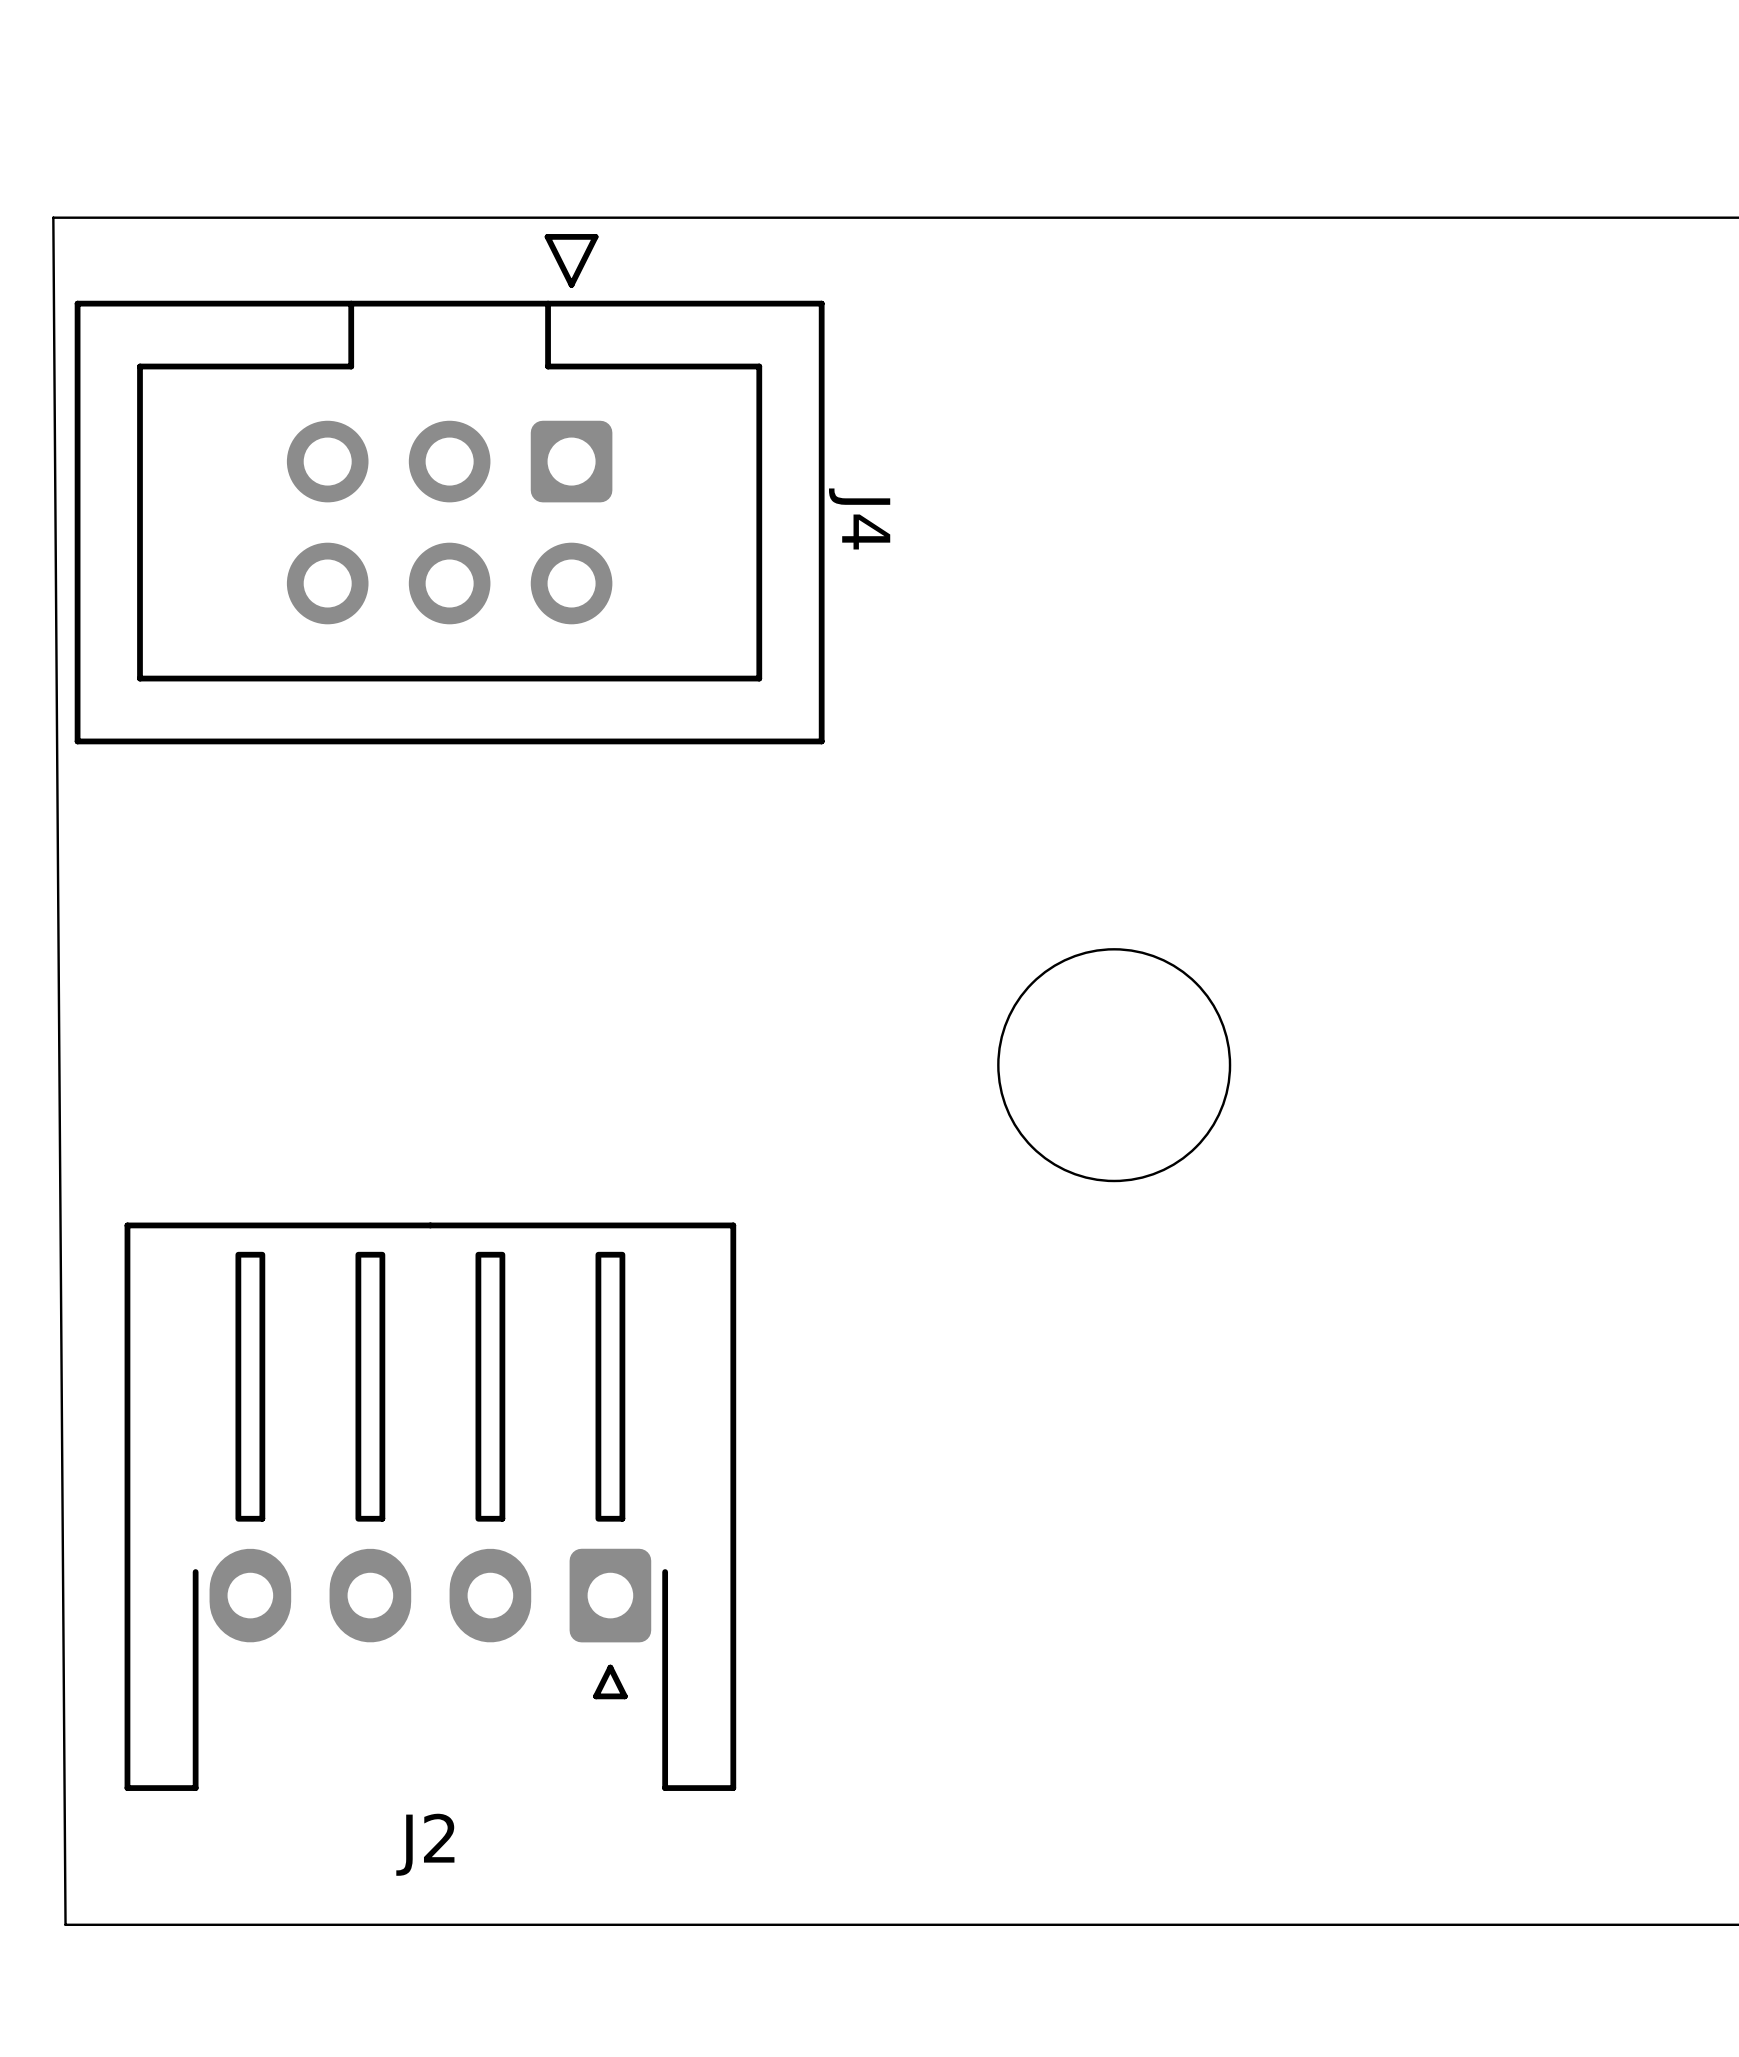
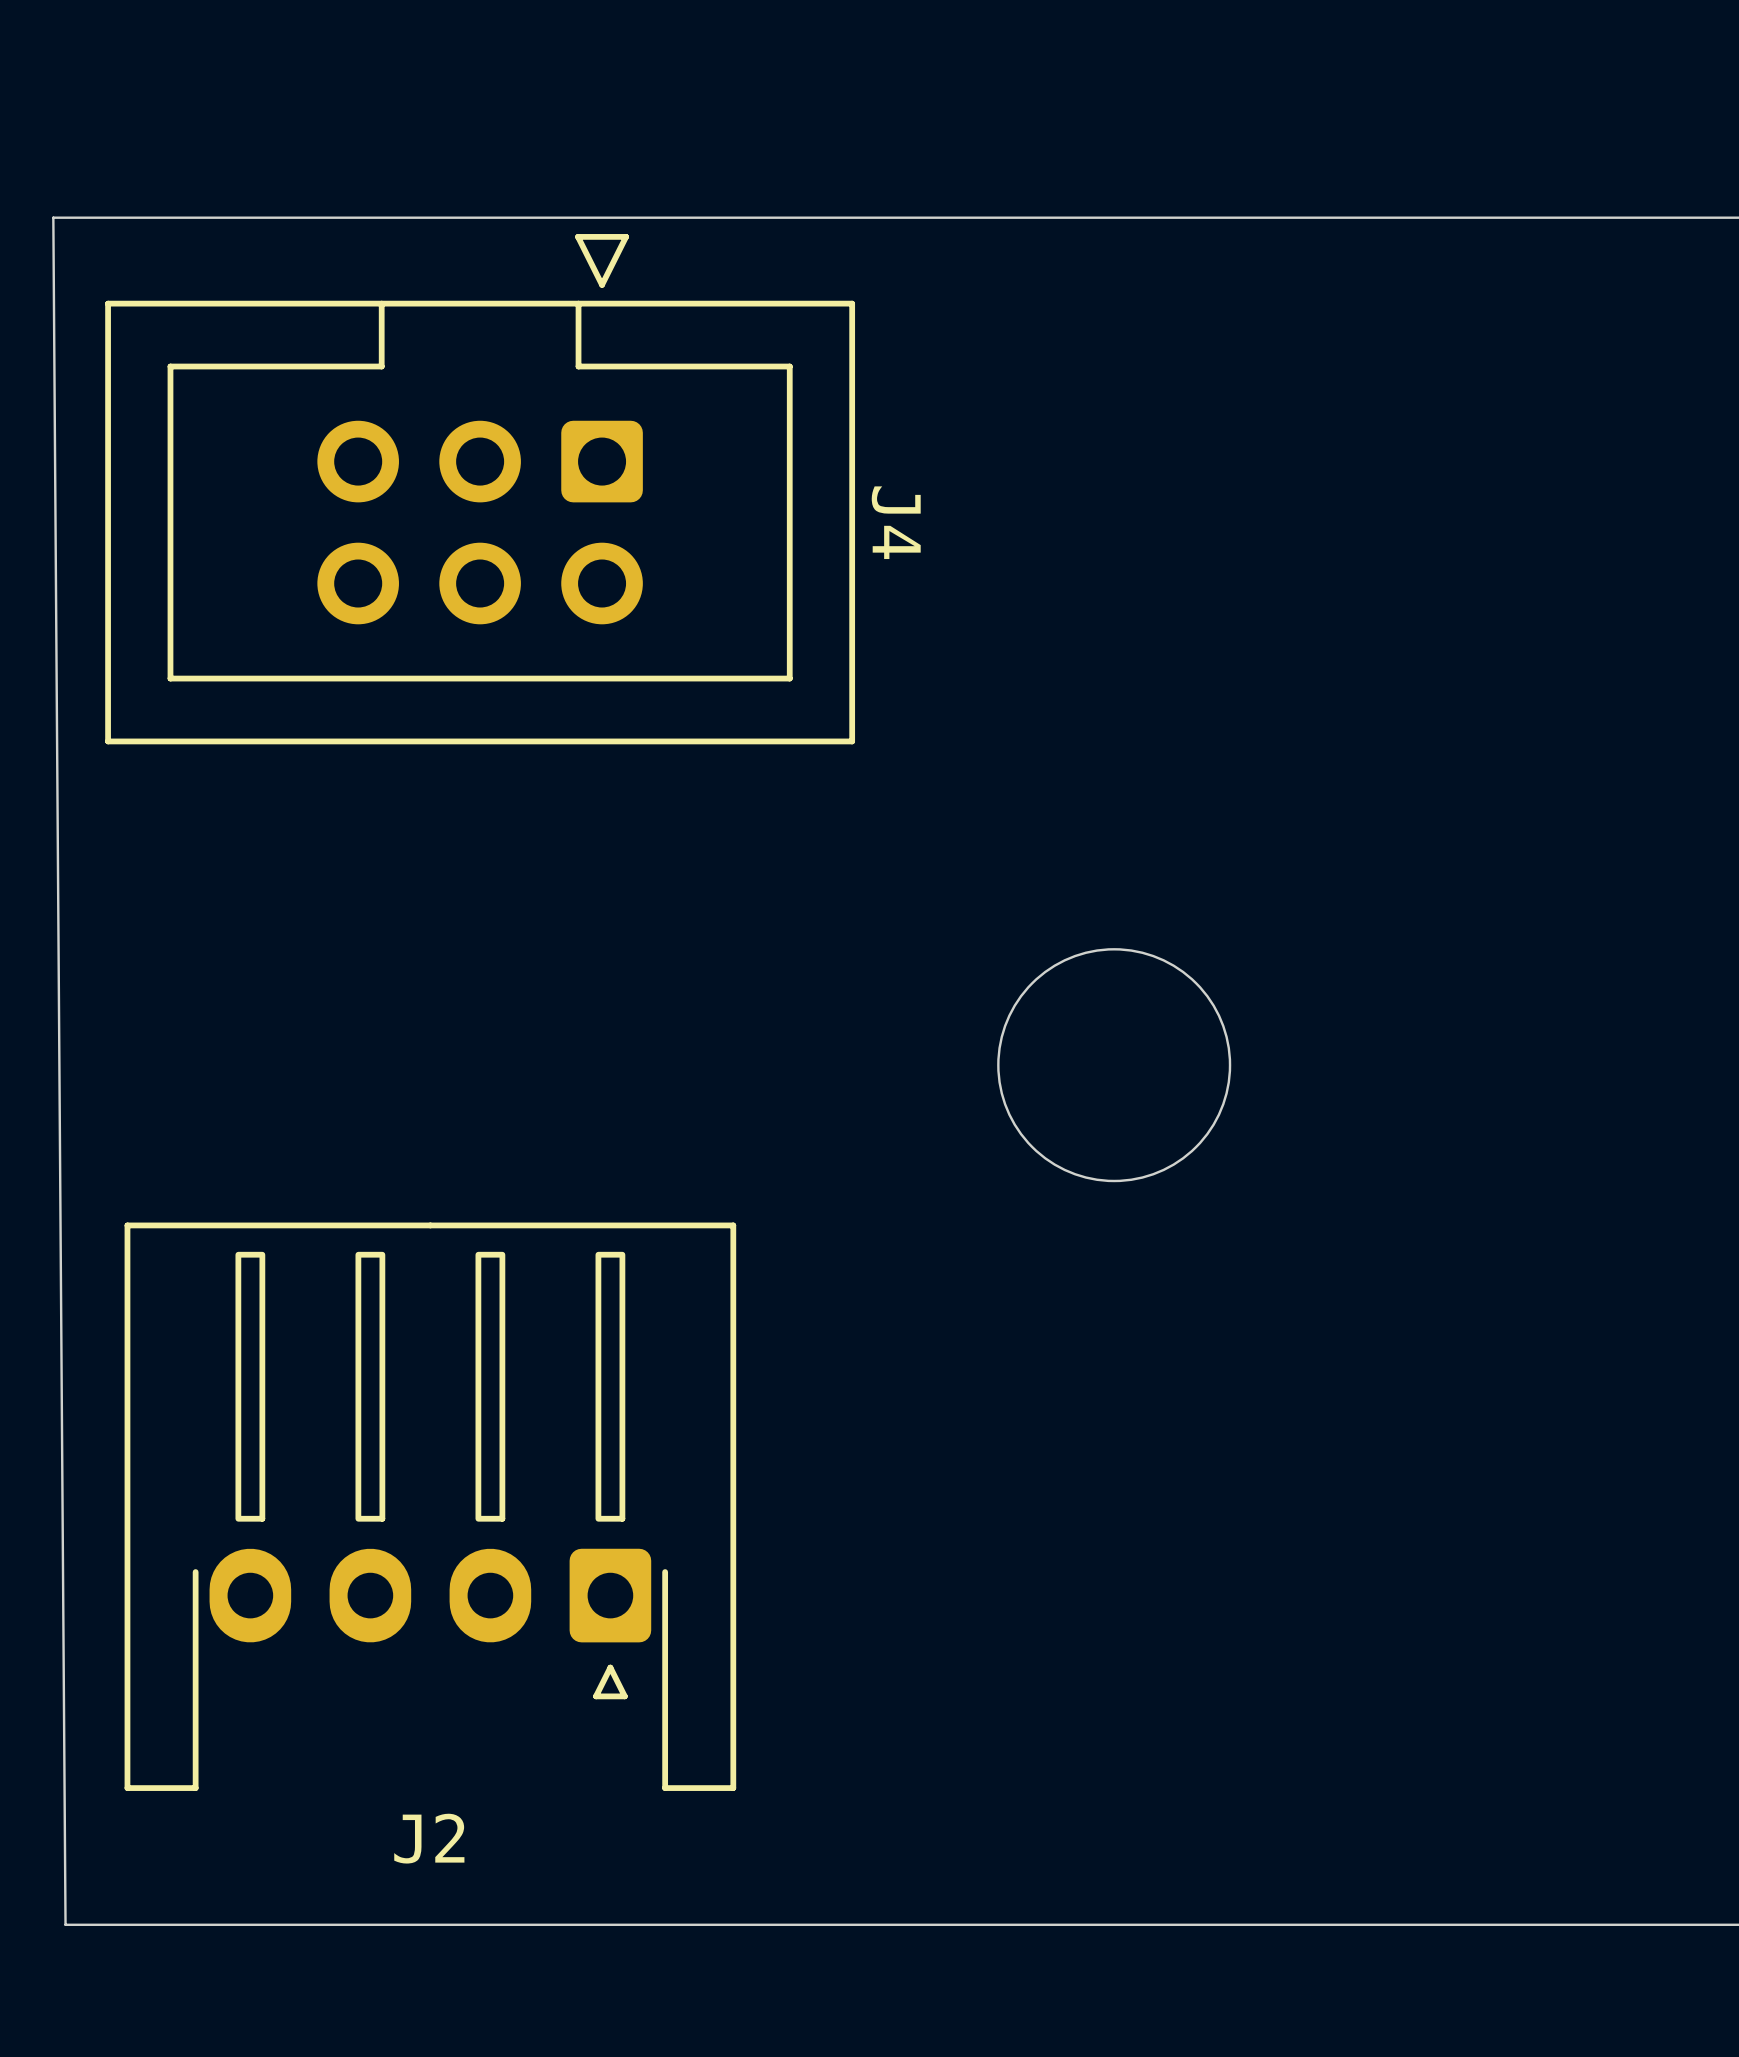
J4 position: (449, 489) -> (480, 489)

